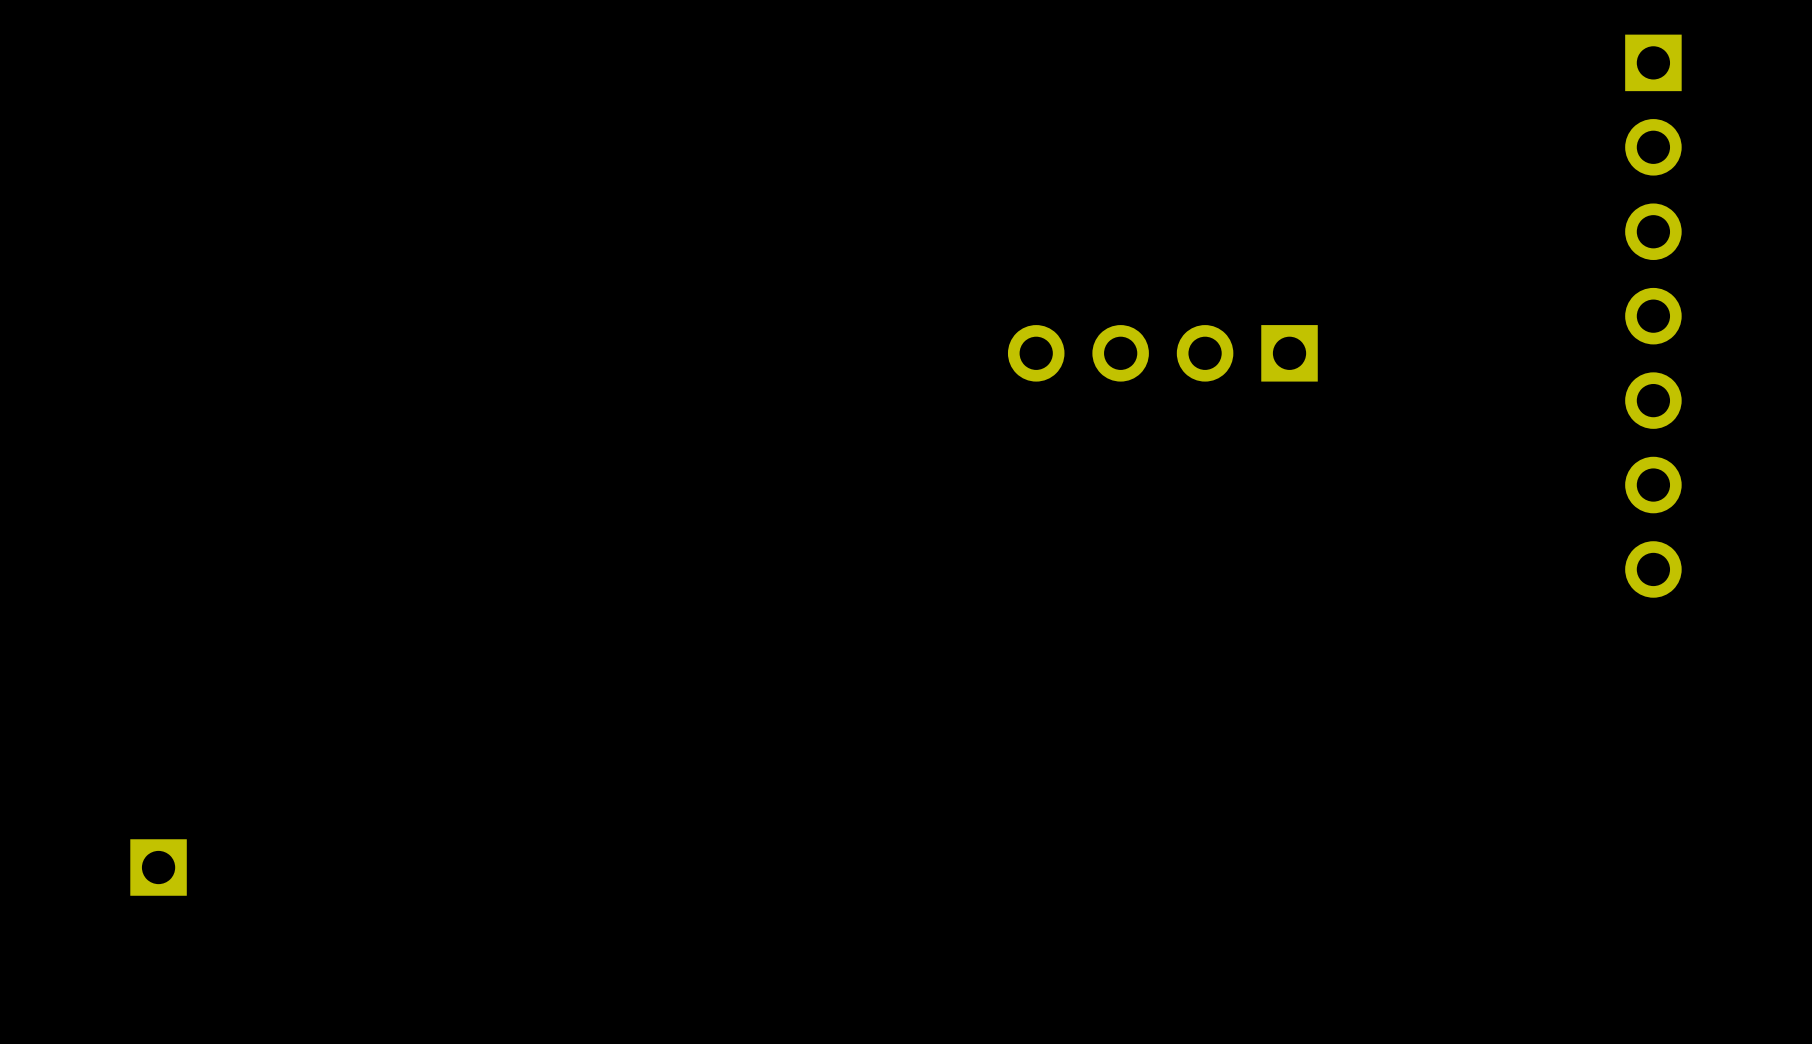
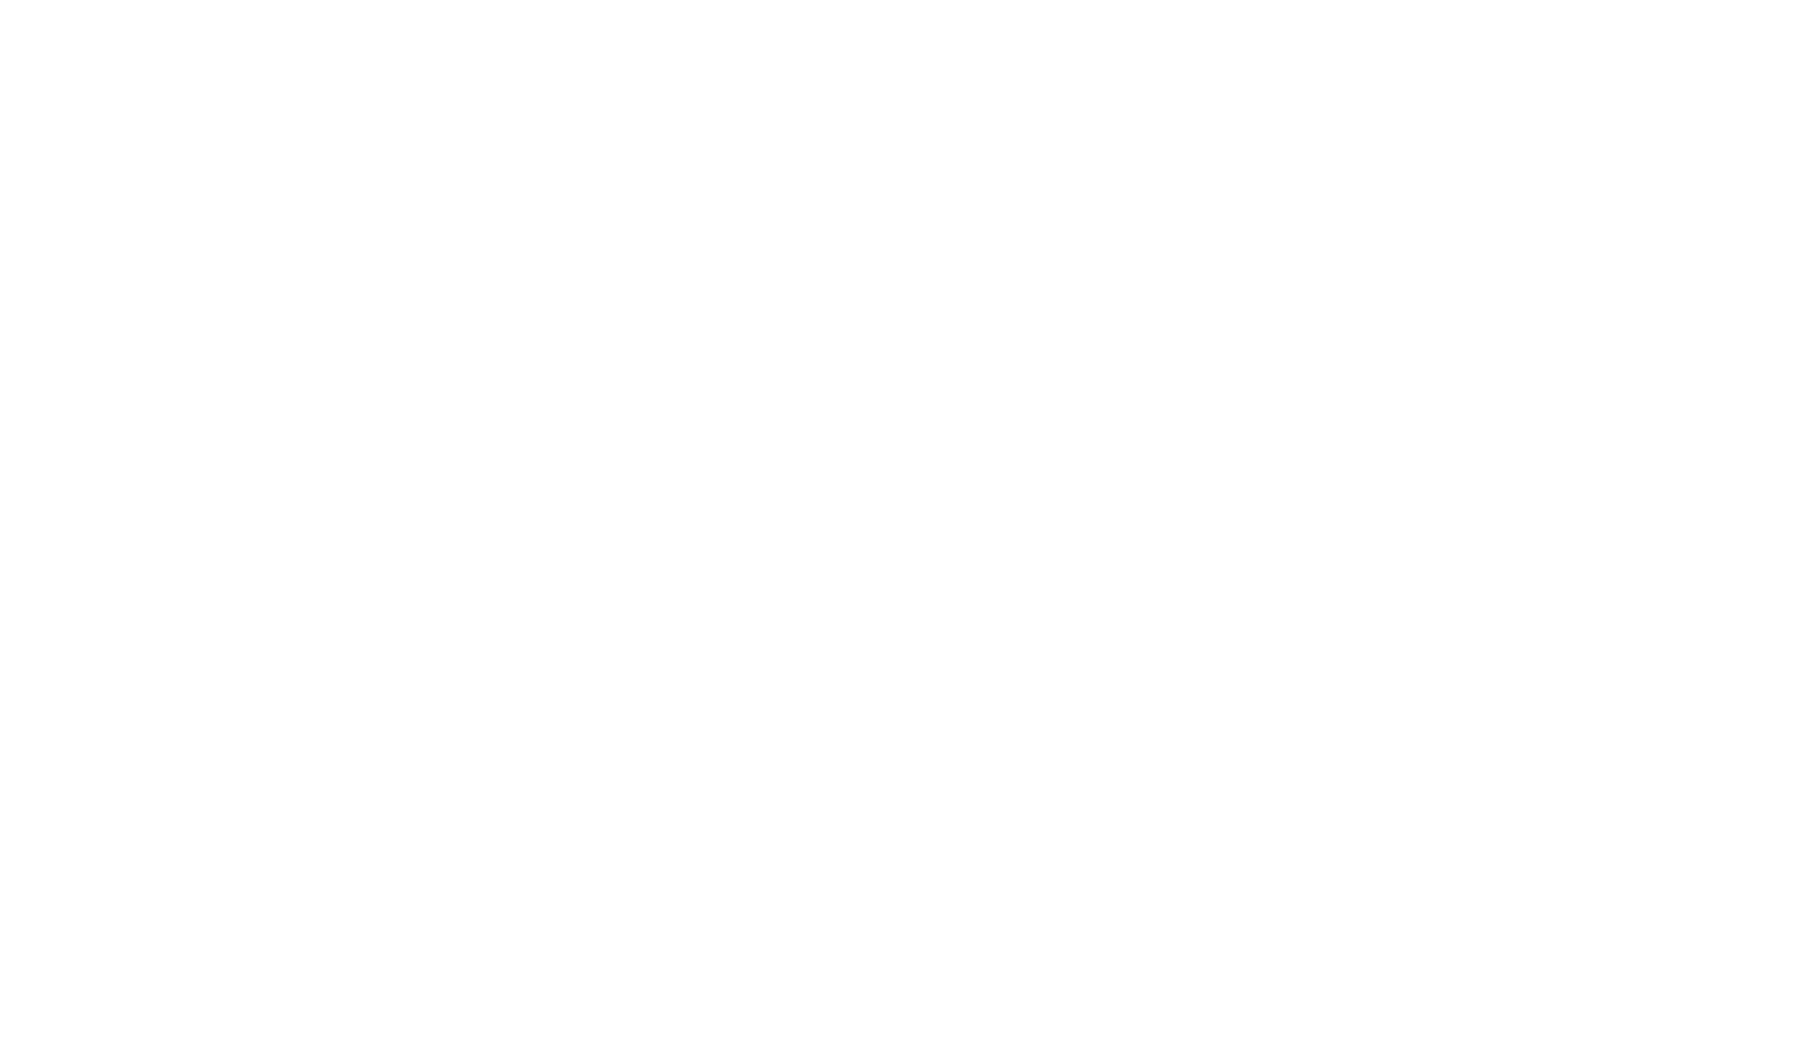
part: (1653, 316) -> none
part: (1162, 353) -> none
part: (158, 867) -> none

